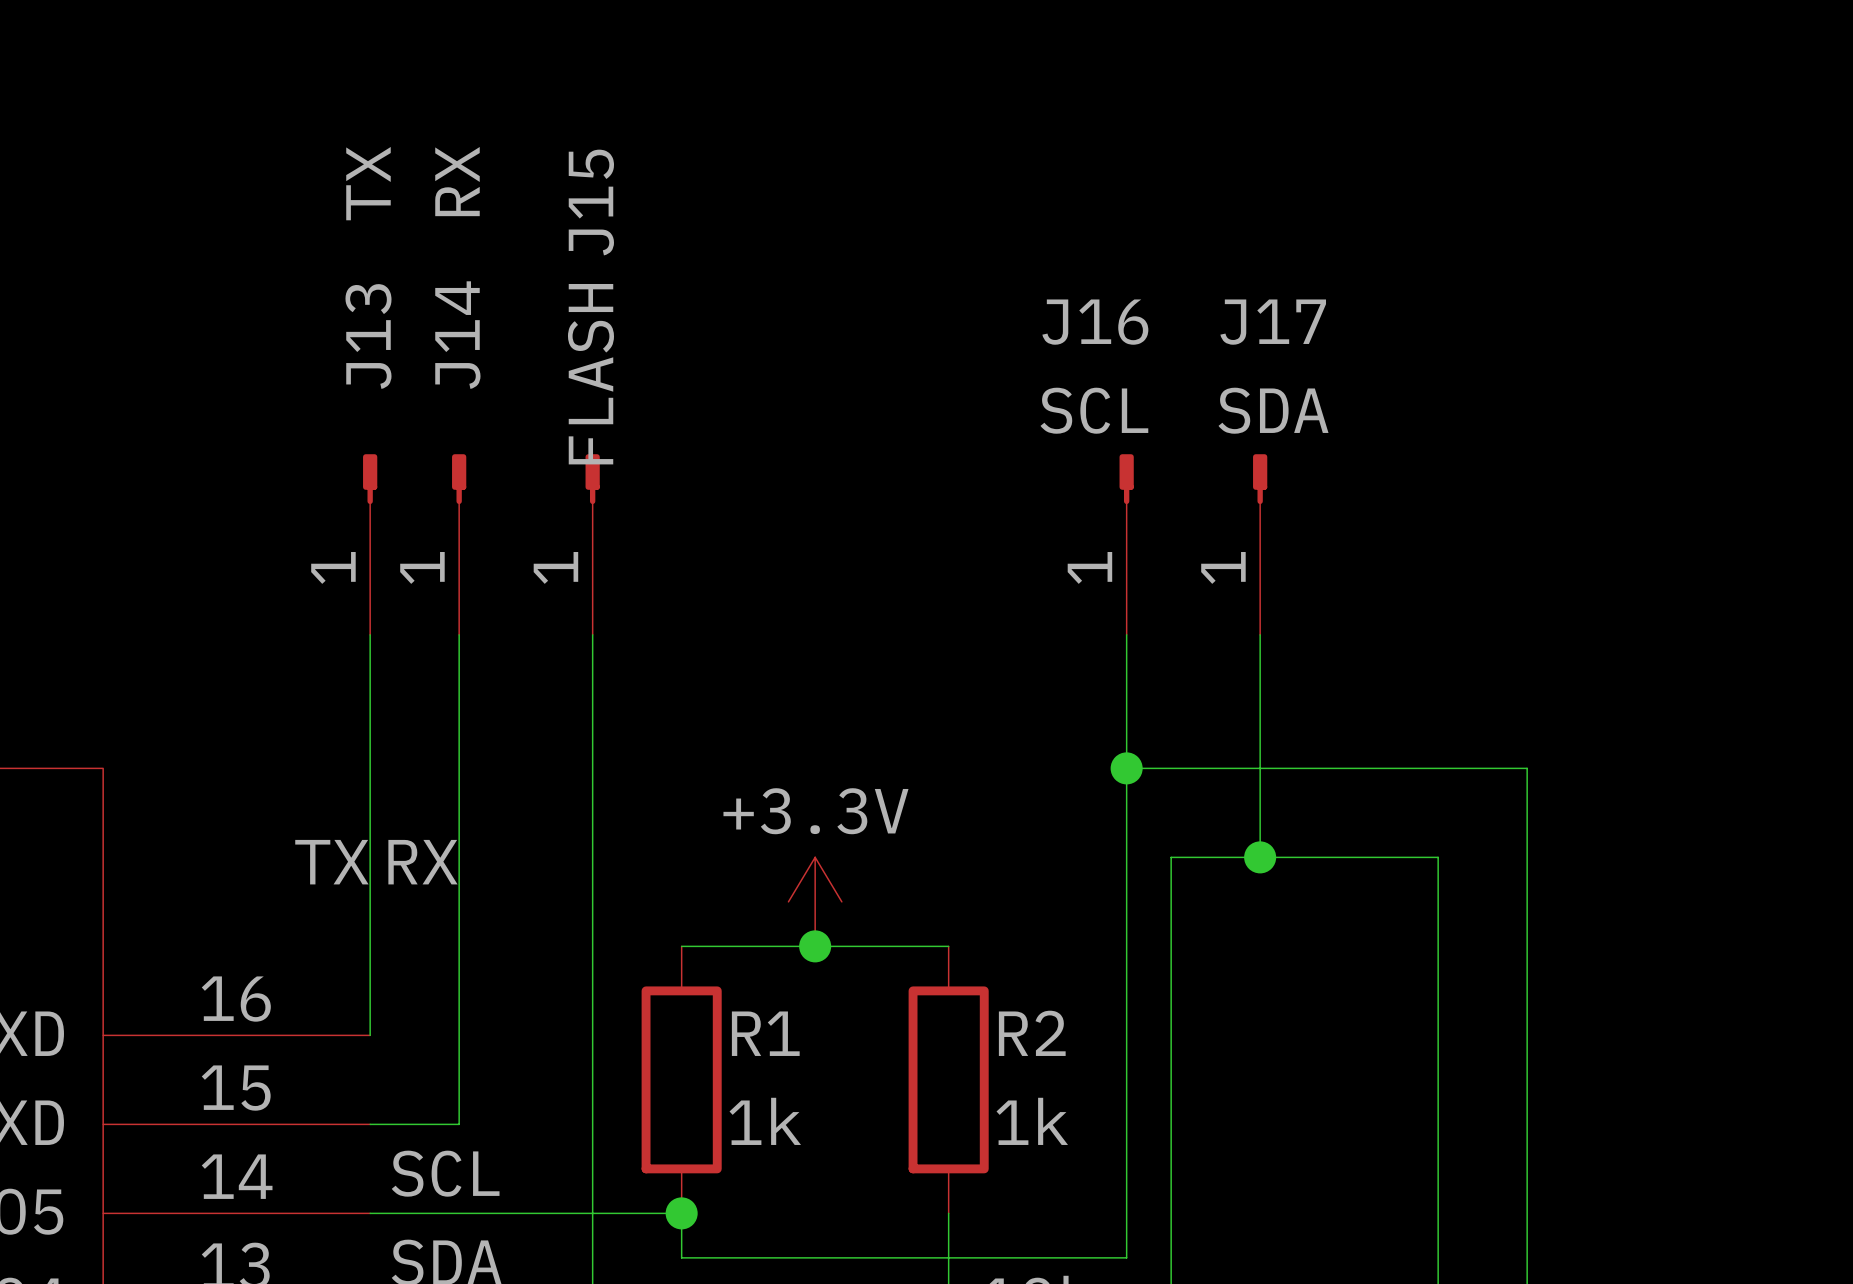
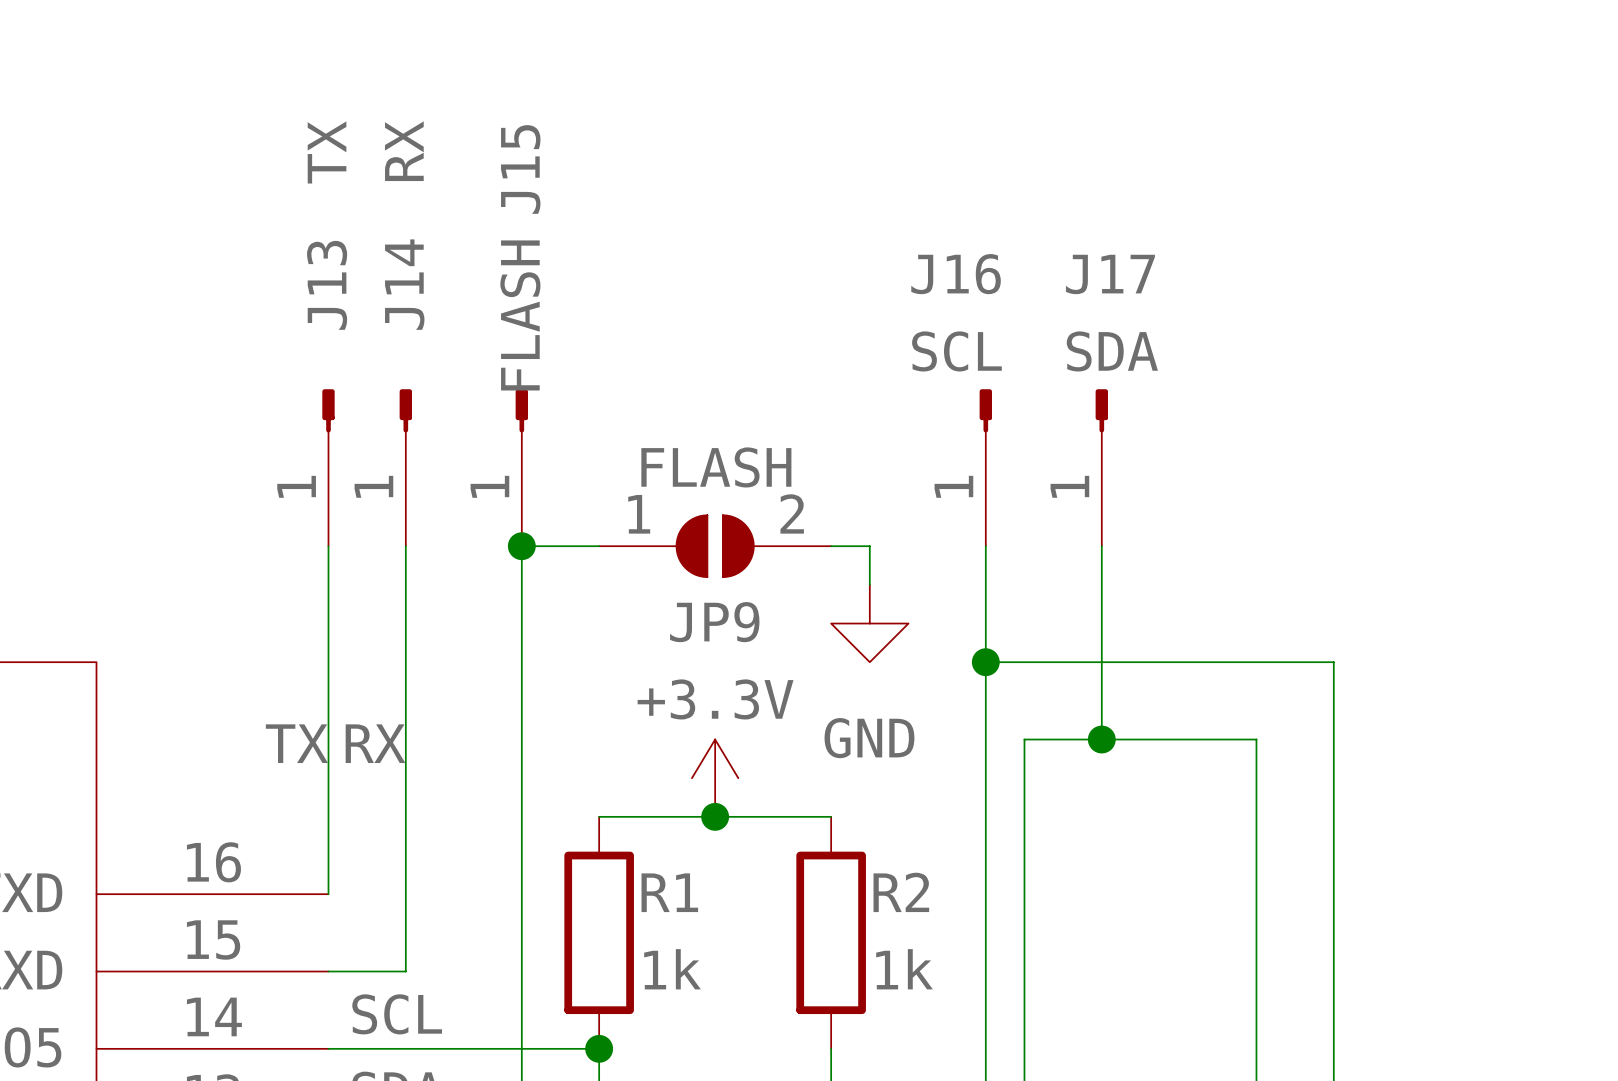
wire: none -> (521, 546) (599, 546)
junction: none -> (521, 546)
JP9: none -> FLASH (715, 546)
wire: none -> (831, 546) (869, 546) (869, 584)
power symbol: none -> GND (869, 623)

